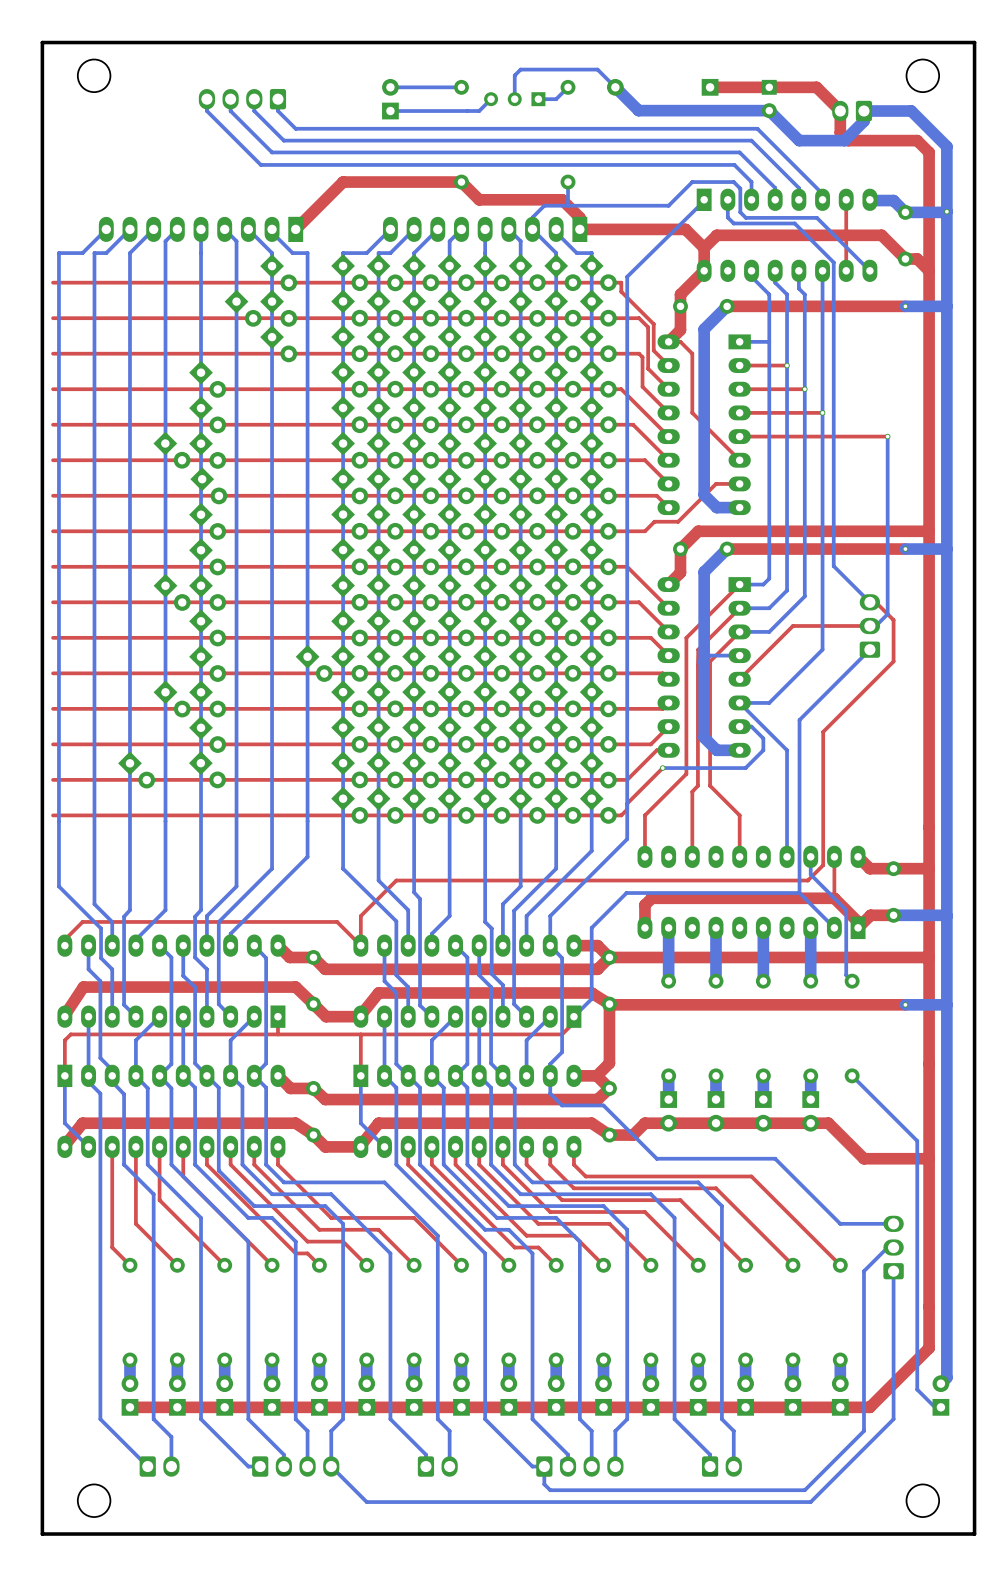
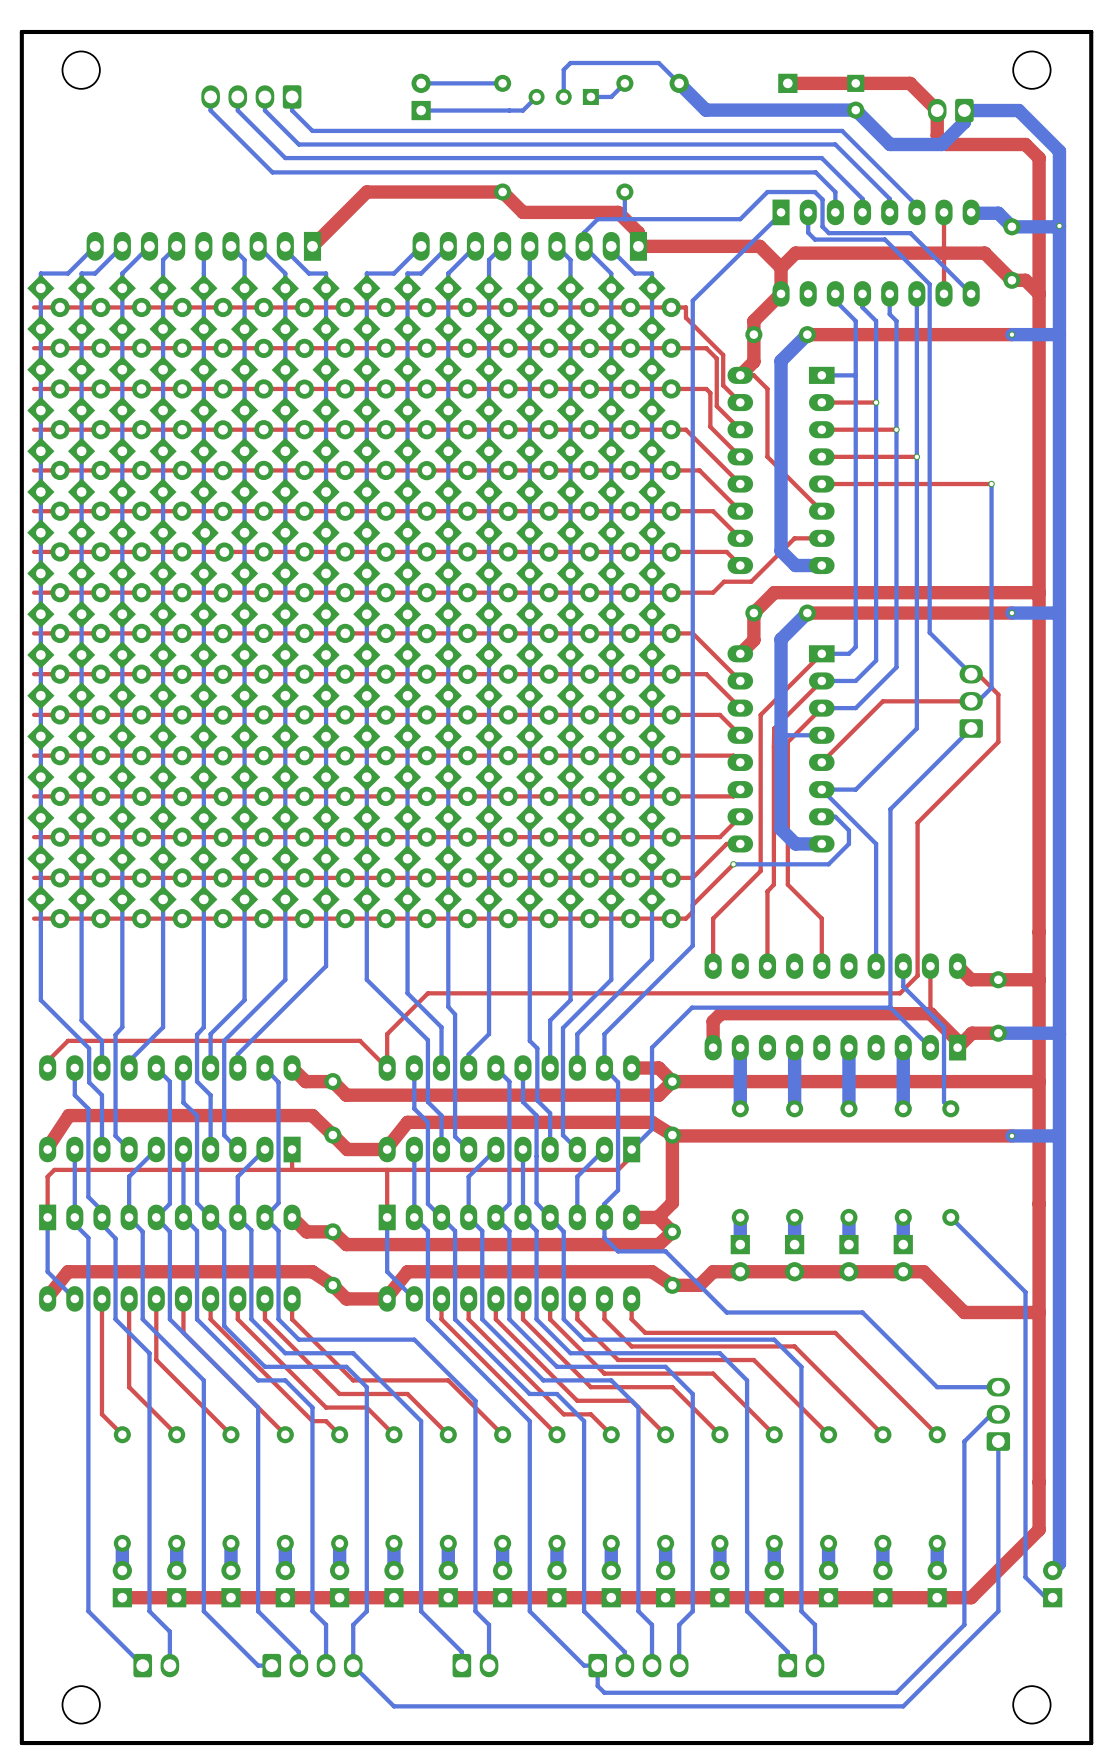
part: none -> (48, 295)
part: none -> (89, 295)
part: none -> (129, 295)
part: none -> (170, 295)
part: none -> (211, 295)
part: none -> (252, 295)
part: none -> (333, 295)
part: none -> (48, 336)
part: none -> (89, 336)
part: none -> (129, 336)
part: none -> (170, 336)
part: none -> (211, 336)
part: none -> (333, 336)
part: none -> (48, 377)
part: none -> (89, 377)
part: none -> (129, 377)
part: none -> (170, 377)
part: none -> (211, 377)
part: none -> (252, 377)
part: none -> (333, 377)
part: none -> (48, 418)
part: none -> (89, 418)
part: none -> (129, 418)
part: none -> (170, 418)
part: none -> (252, 418)
part: none -> (292, 418)
part: none -> (333, 418)
part: none -> (48, 458)
part: none -> (89, 458)
part: none -> (129, 458)
part: none -> (170, 458)
part: none -> (252, 458)
part: none -> (292, 458)
part: none -> (333, 458)
part: none -> (48, 499)
part: none -> (89, 499)
part: none -> (129, 499)
part: none -> (252, 499)
part: none -> (292, 499)
part: none -> (333, 499)
part: none -> (48, 540)
part: none -> (89, 540)
part: none -> (129, 540)
part: none -> (170, 540)
part: none -> (252, 540)
part: none -> (292, 540)
part: none -> (333, 540)
part: none -> (48, 581)
part: none -> (89, 581)
part: none -> (129, 581)
part: none -> (170, 581)
part: none -> (252, 581)
part: none -> (292, 581)
part: none -> (333, 581)
part: none -> (48, 621)
part: none -> (89, 621)
part: none -> (129, 621)
part: none -> (170, 621)
part: none -> (252, 621)
part: none -> (292, 621)
part: none -> (333, 621)
part: none -> (48, 662)
part: none -> (89, 662)
part: none -> (129, 662)
part: none -> (252, 662)
part: none -> (292, 662)
part: none -> (333, 662)
part: none -> (48, 703)
part: none -> (89, 703)
part: none -> (129, 703)
part: none -> (170, 703)
part: none -> (252, 703)
part: none -> (292, 703)
part: none -> (333, 703)
part: none -> (48, 744)
part: none -> (89, 744)
part: none -> (129, 744)
part: none -> (170, 744)
part: none -> (252, 744)
part: none -> (292, 744)
part: none -> (48, 784)
part: none -> (89, 784)
part: none -> (129, 784)
part: none -> (252, 784)
part: none -> (292, 784)
part: none -> (333, 784)
part: none -> (48, 825)
part: none -> (89, 825)
part: none -> (129, 825)
part: none -> (170, 825)
part: none -> (252, 825)
part: none -> (292, 825)
part: none -> (333, 825)
part: none -> (48, 866)
part: none -> (89, 866)
part: none -> (170, 866)
part: none -> (252, 866)
part: none -> (292, 866)
part: none -> (333, 866)
part: none -> (48, 907)
part: none -> (89, 907)
part: none -> (129, 907)
part: none -> (170, 907)
part: none -> (211, 907)
part: none -> (252, 907)
part: none -> (292, 907)
part: none -> (333, 907)

